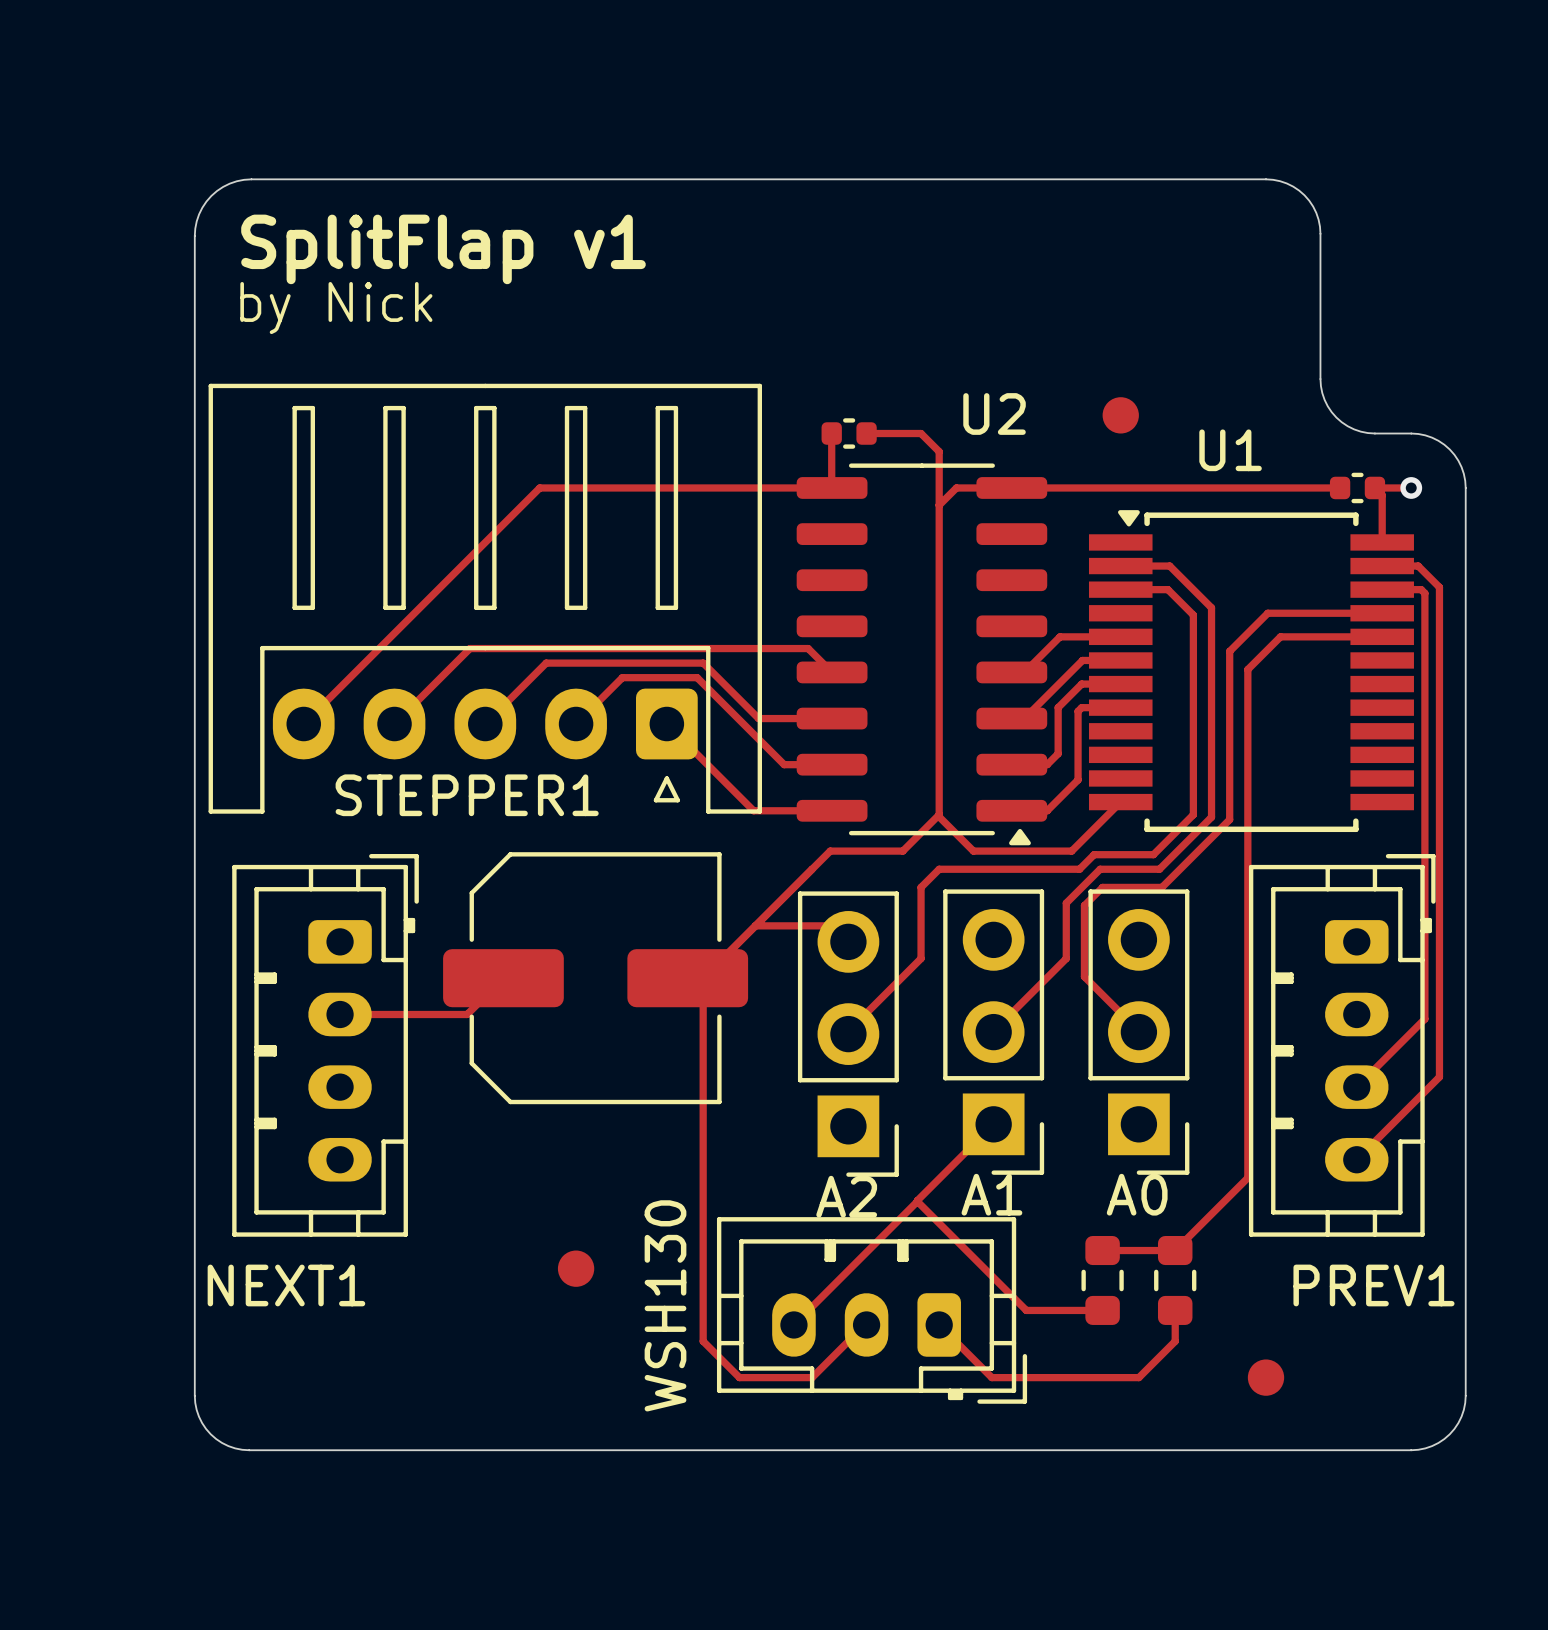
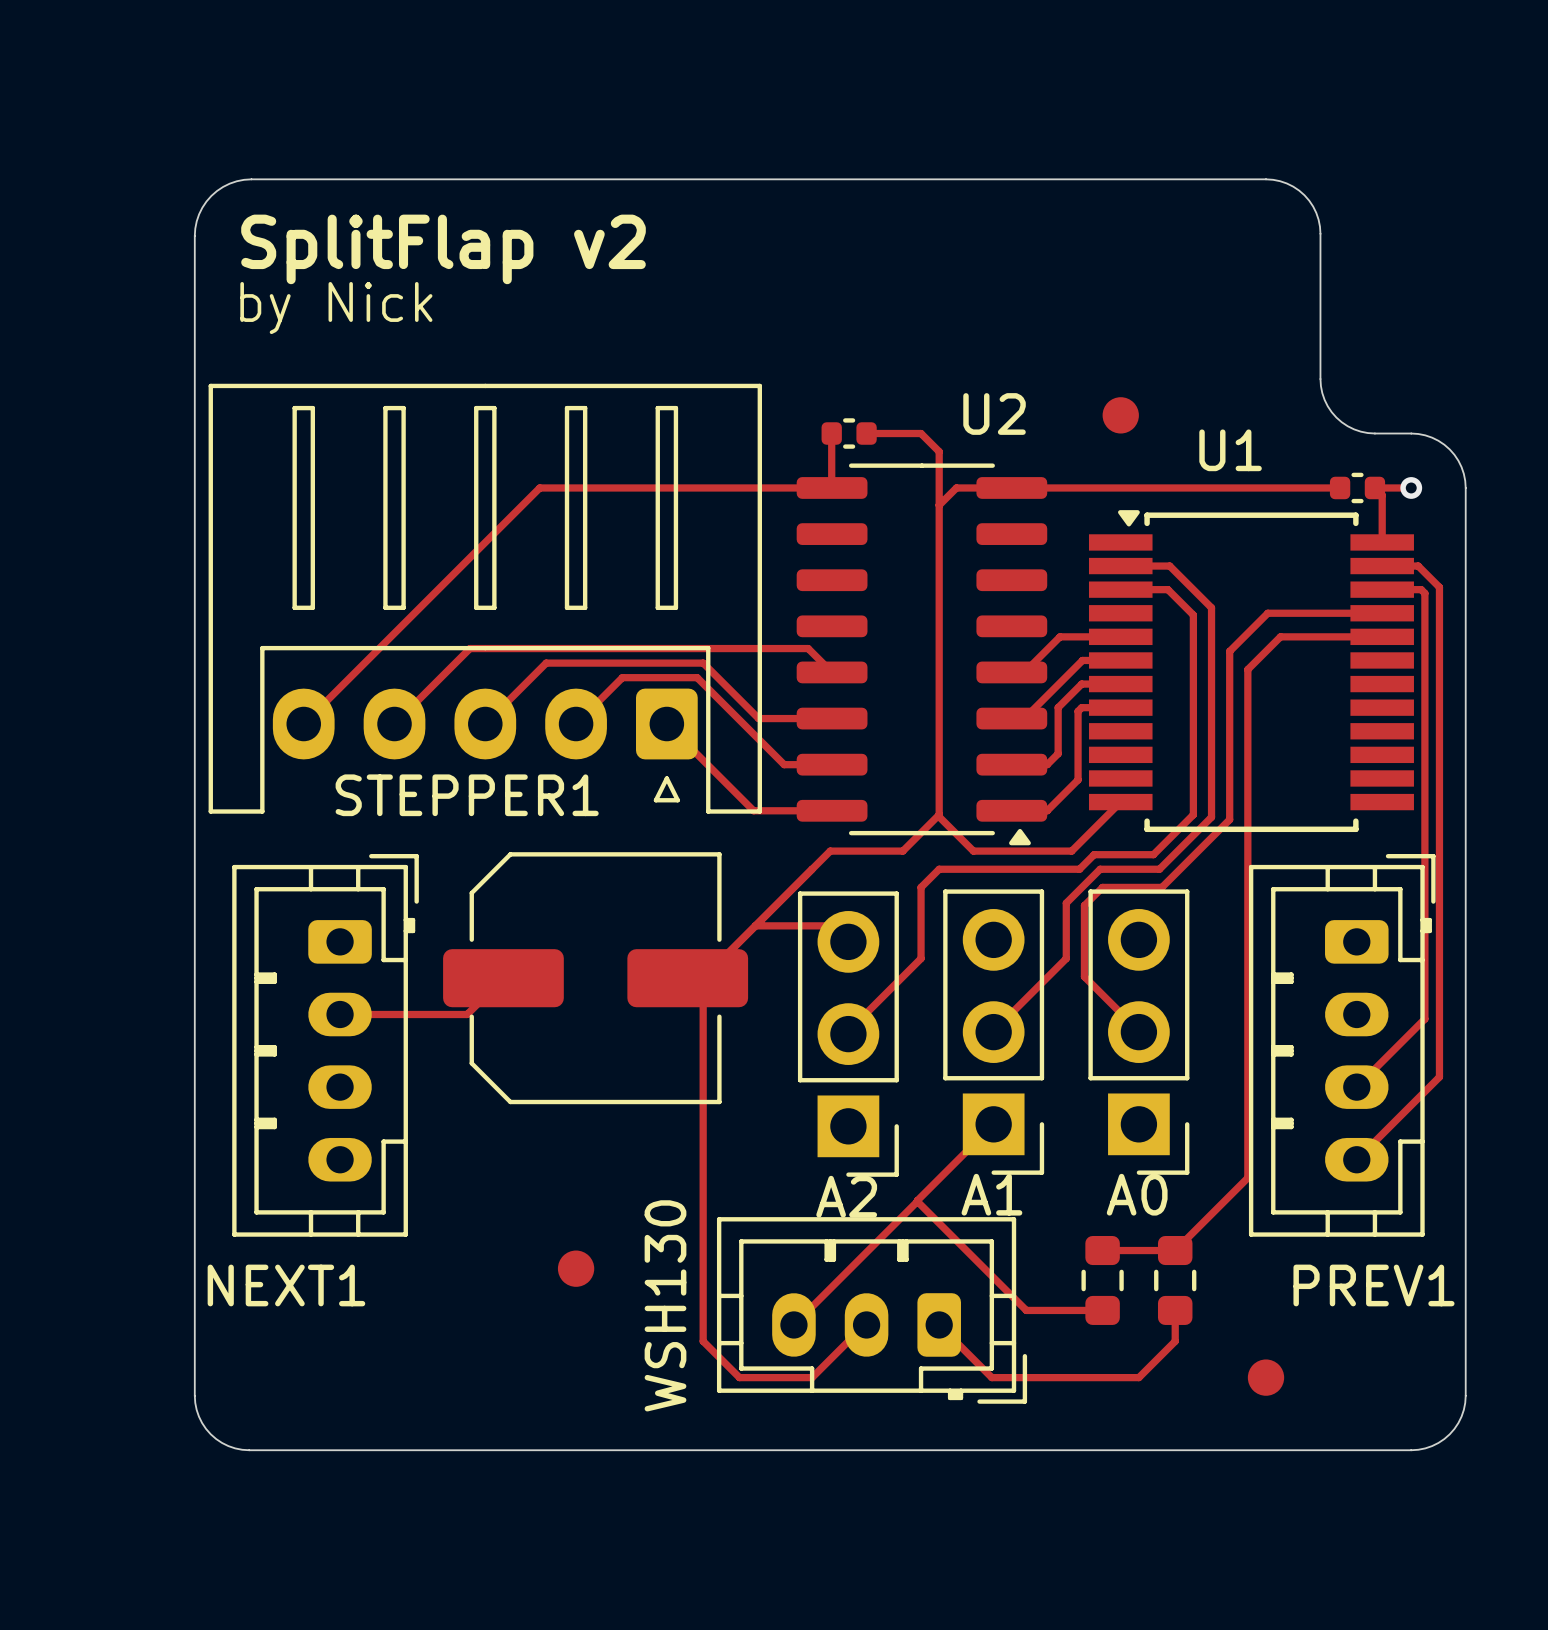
text: SplitFlap v1 (443, 249) -> SplitFlap v2 (443, 249)

